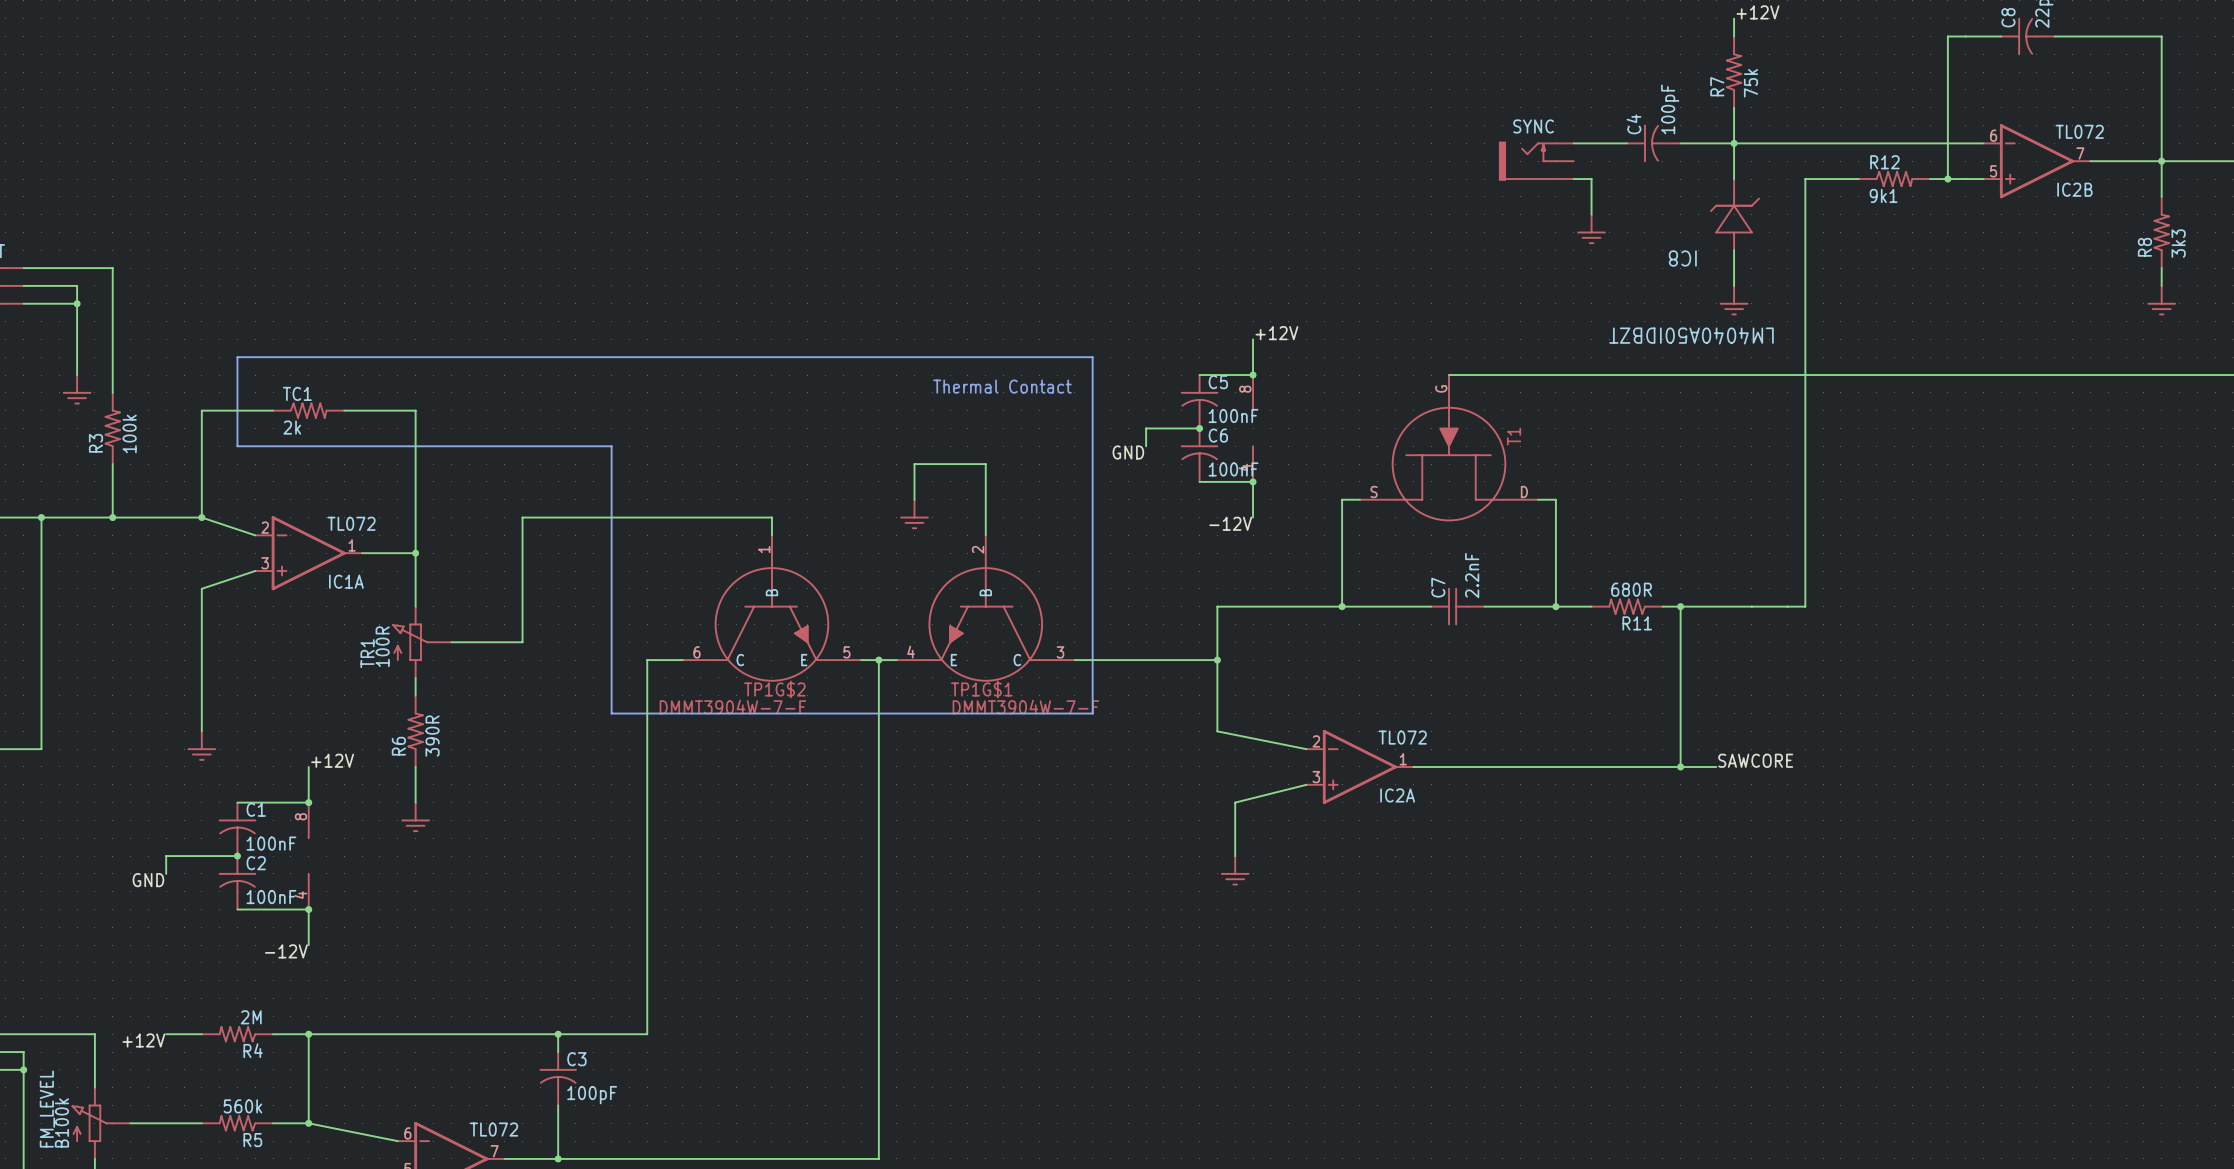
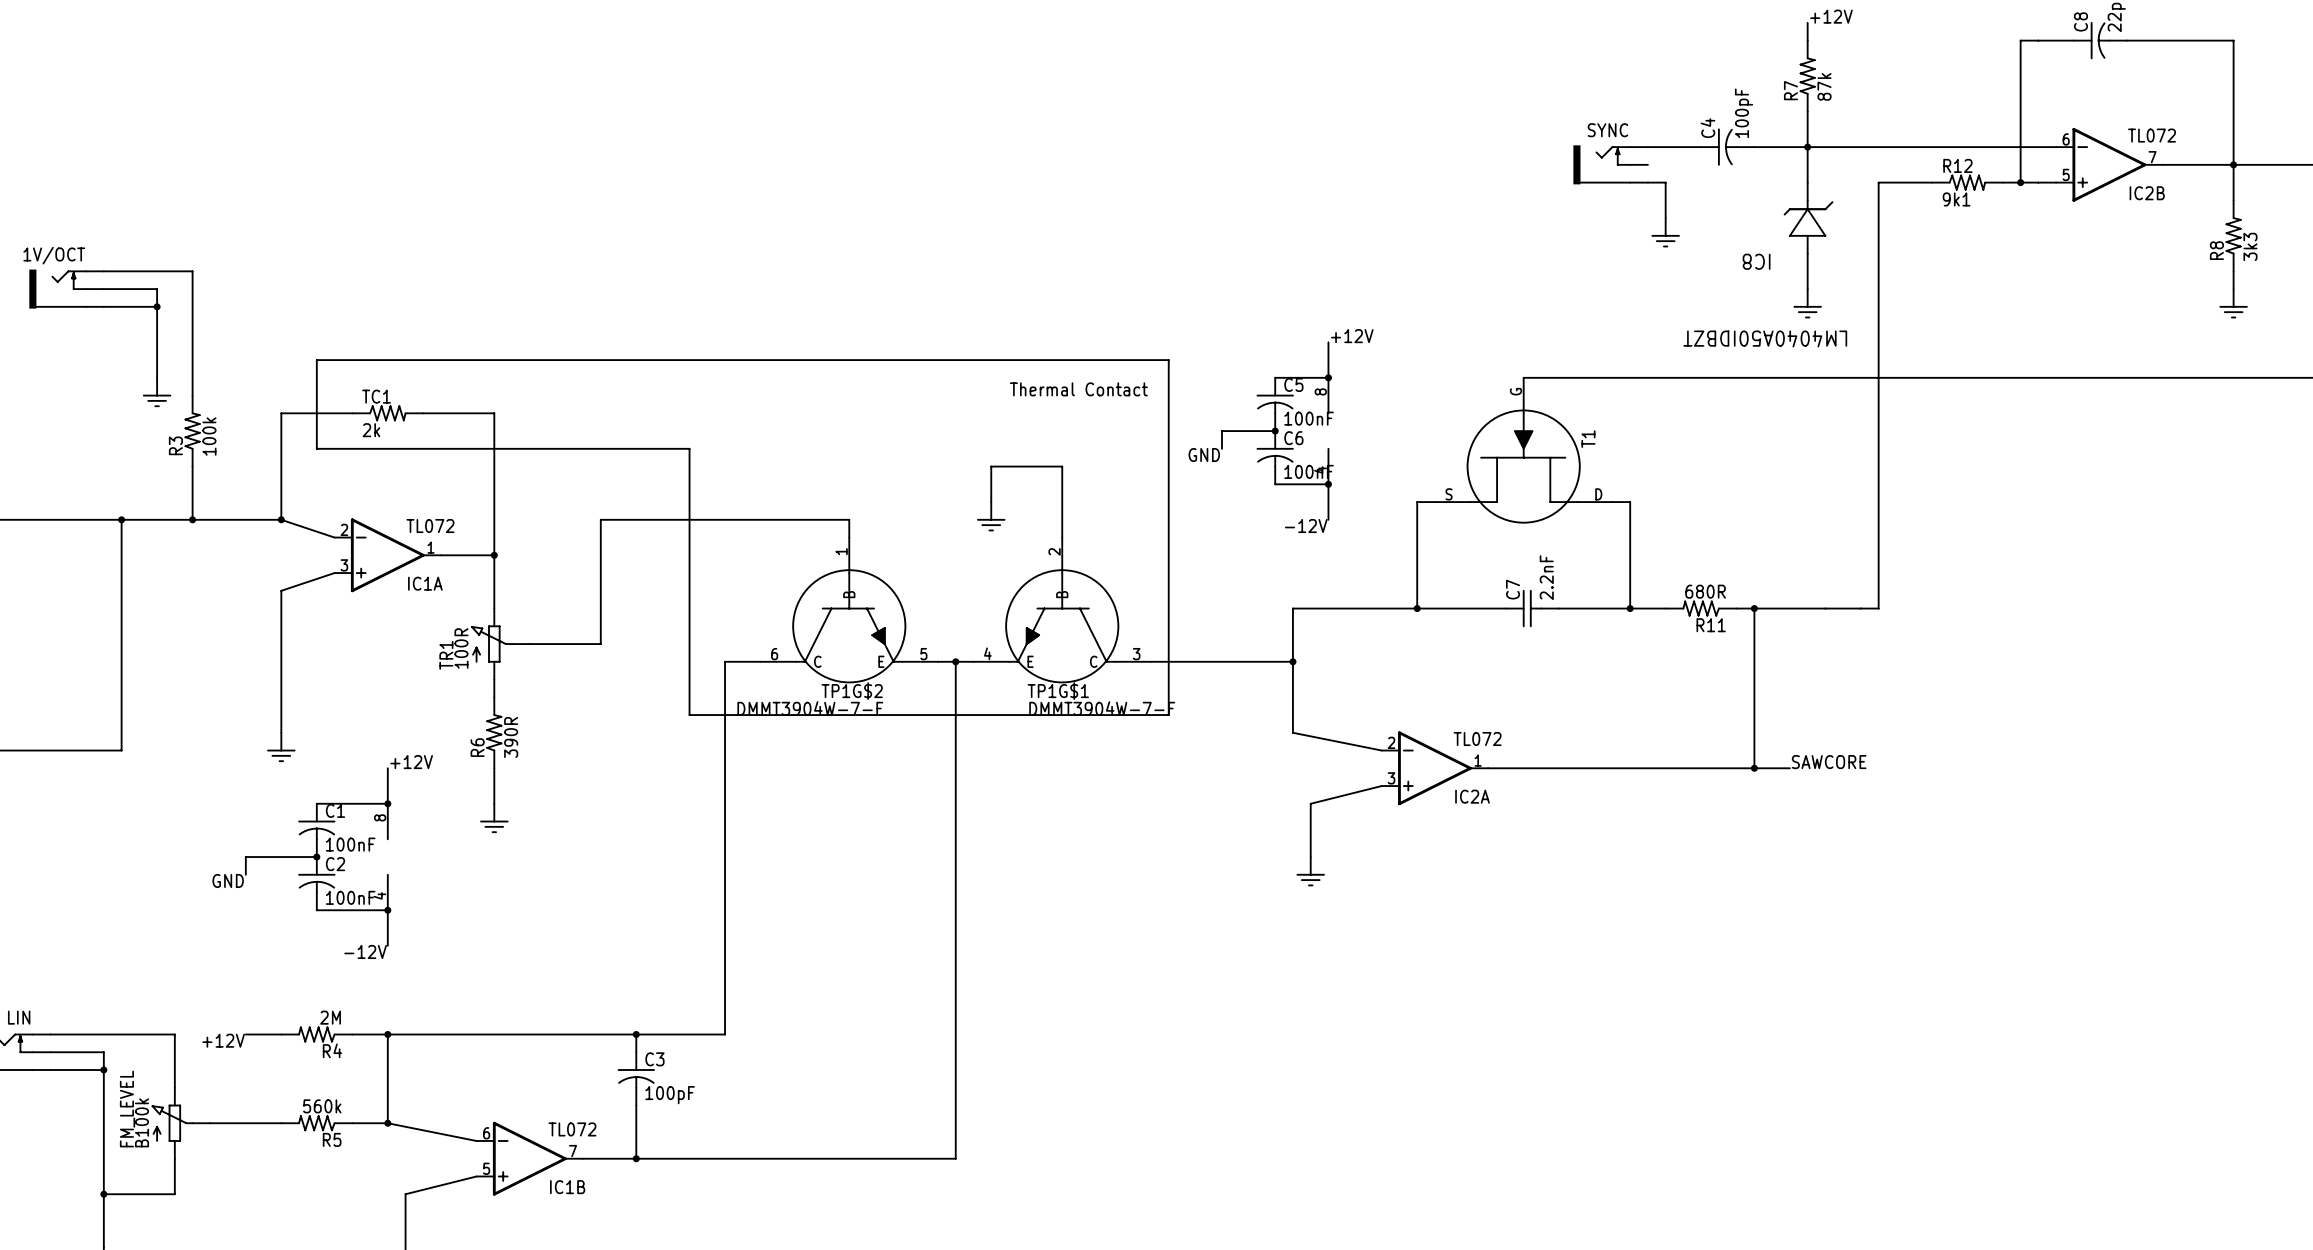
R7 value: 75k (1751, 83) -> 87k (1824, 86)

